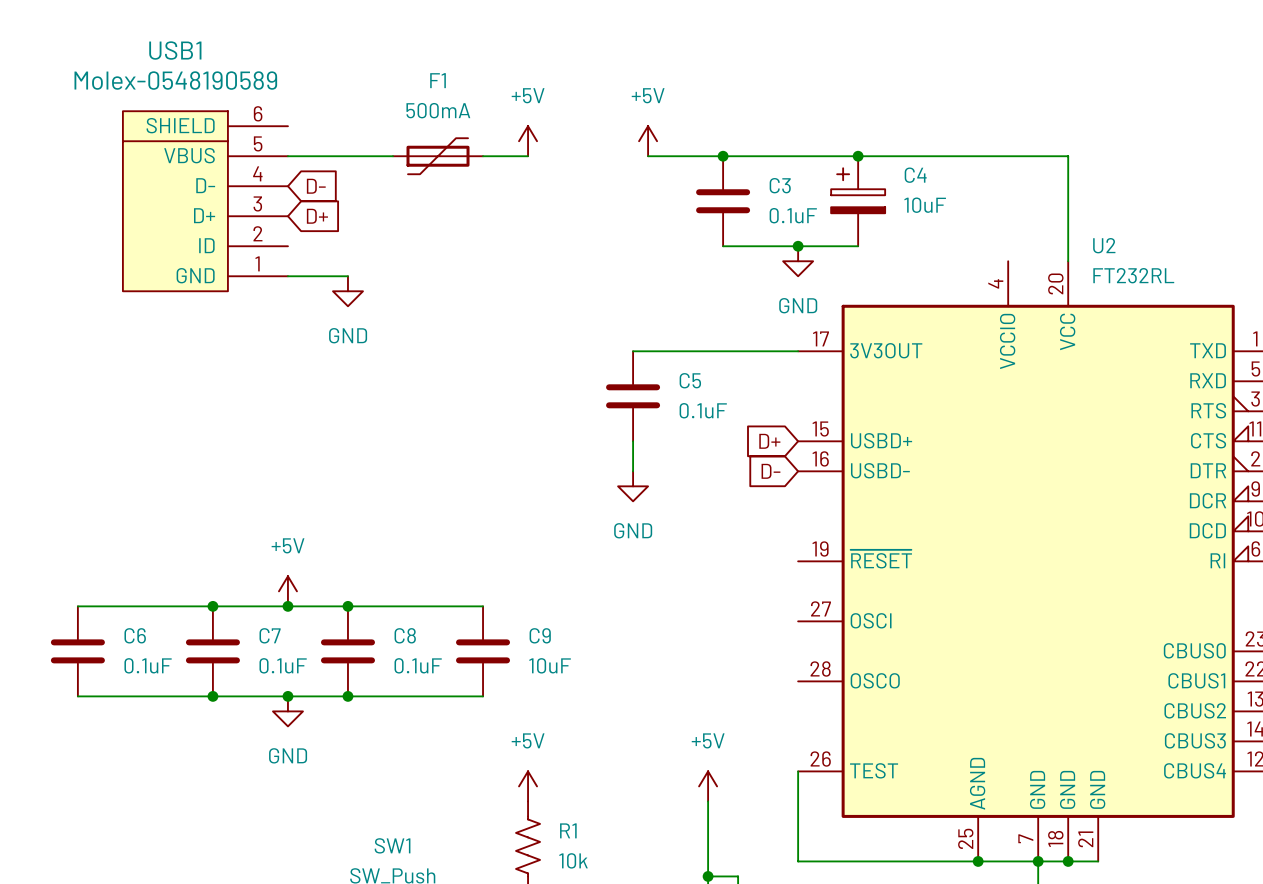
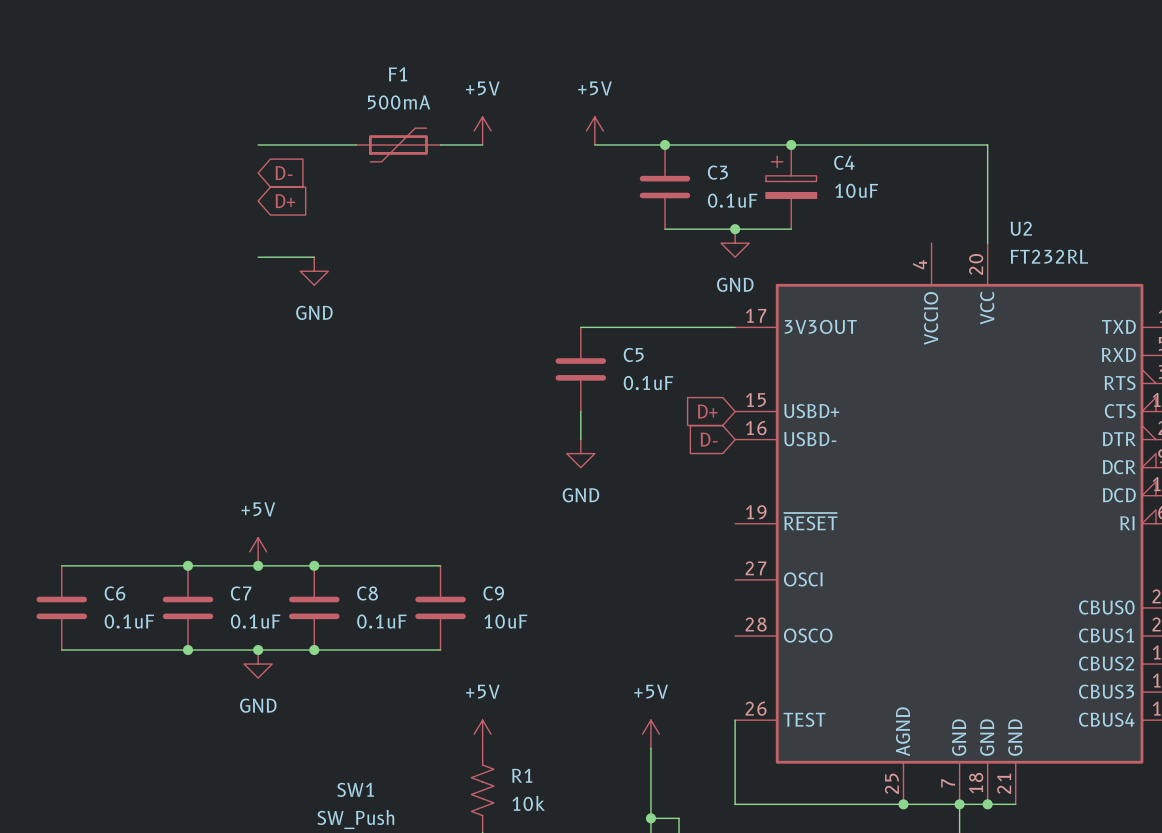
USB1: Molex-0548190589 (205, 201) -> none

